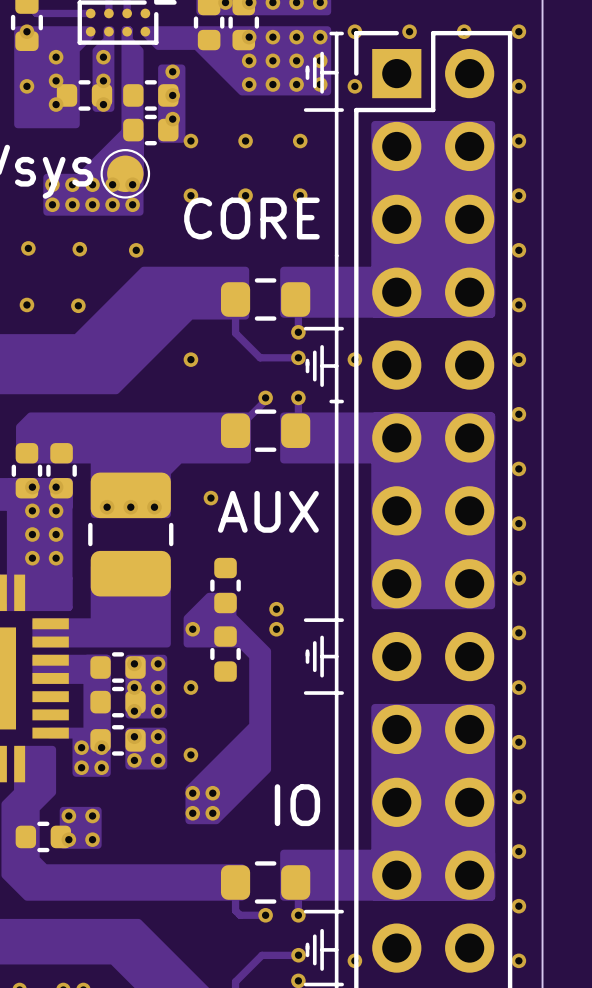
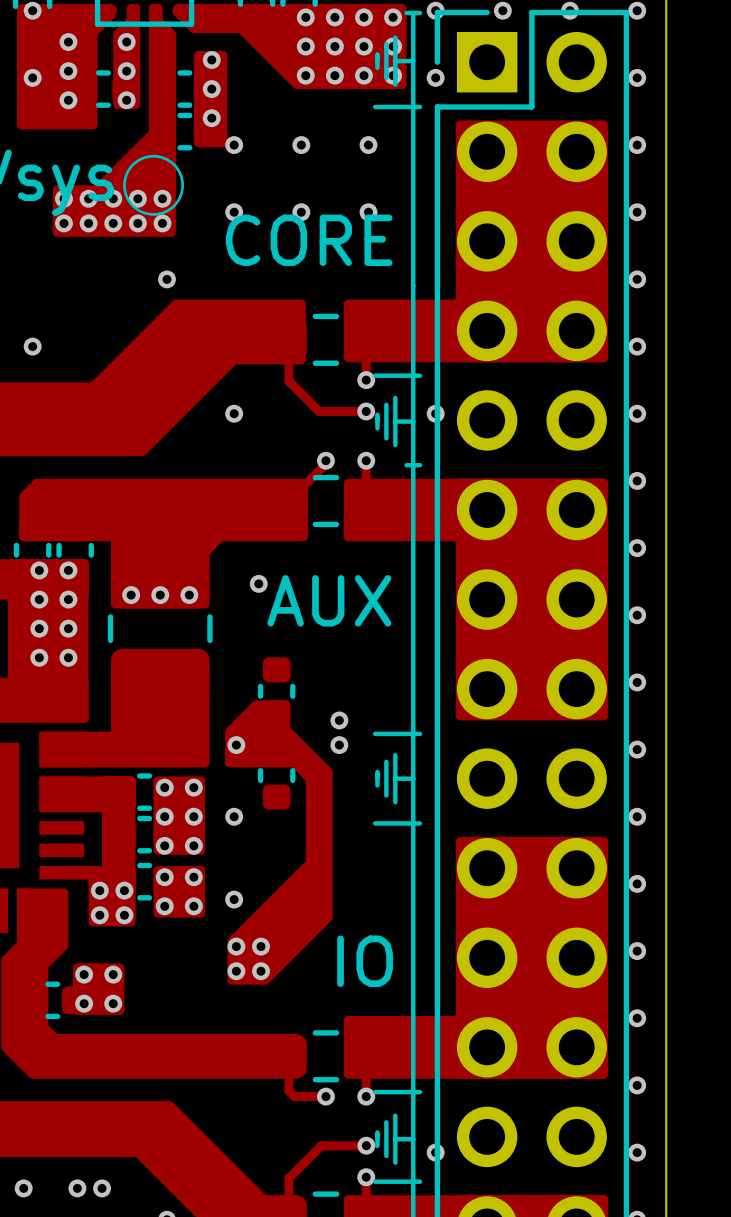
via: (28, 248) -> none
via: (79, 249) -> none
via: (78, 305) -> none

